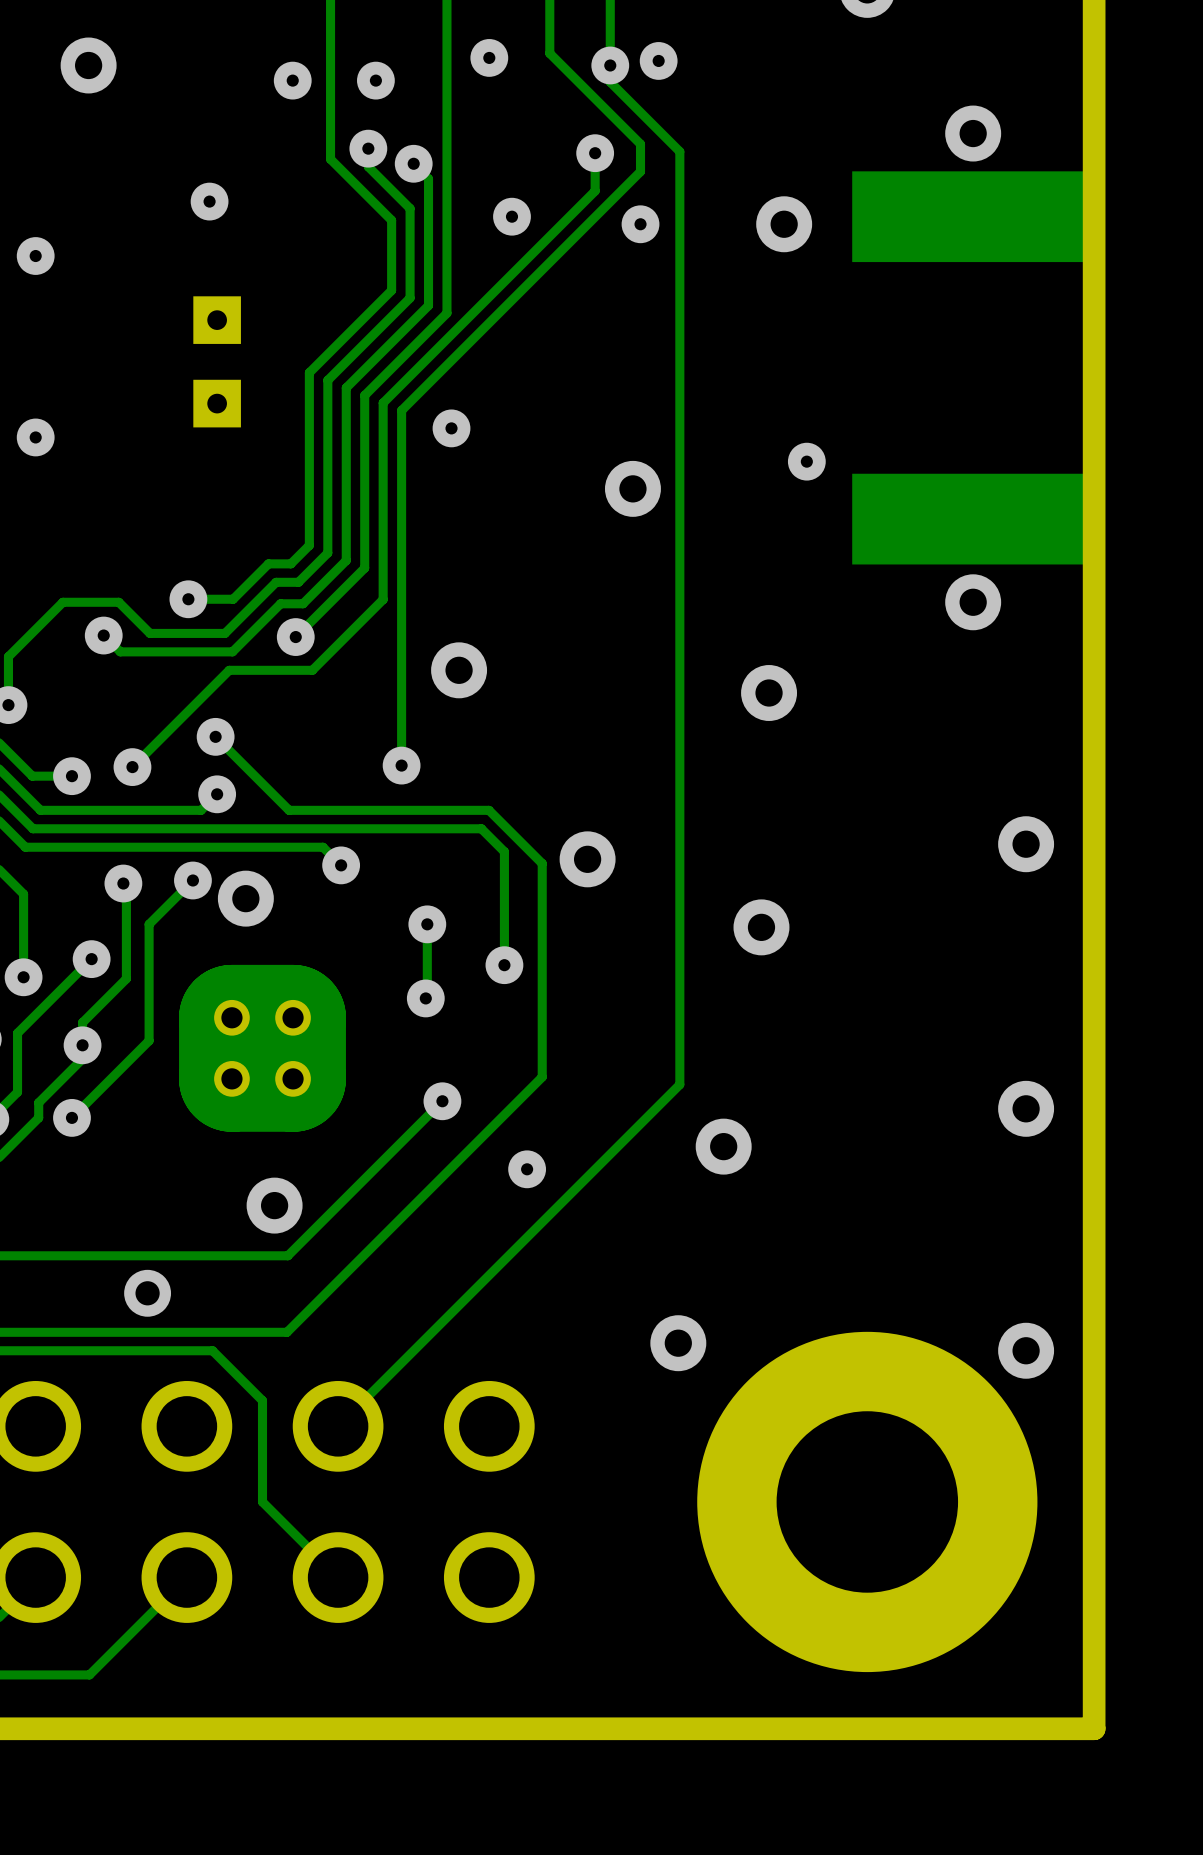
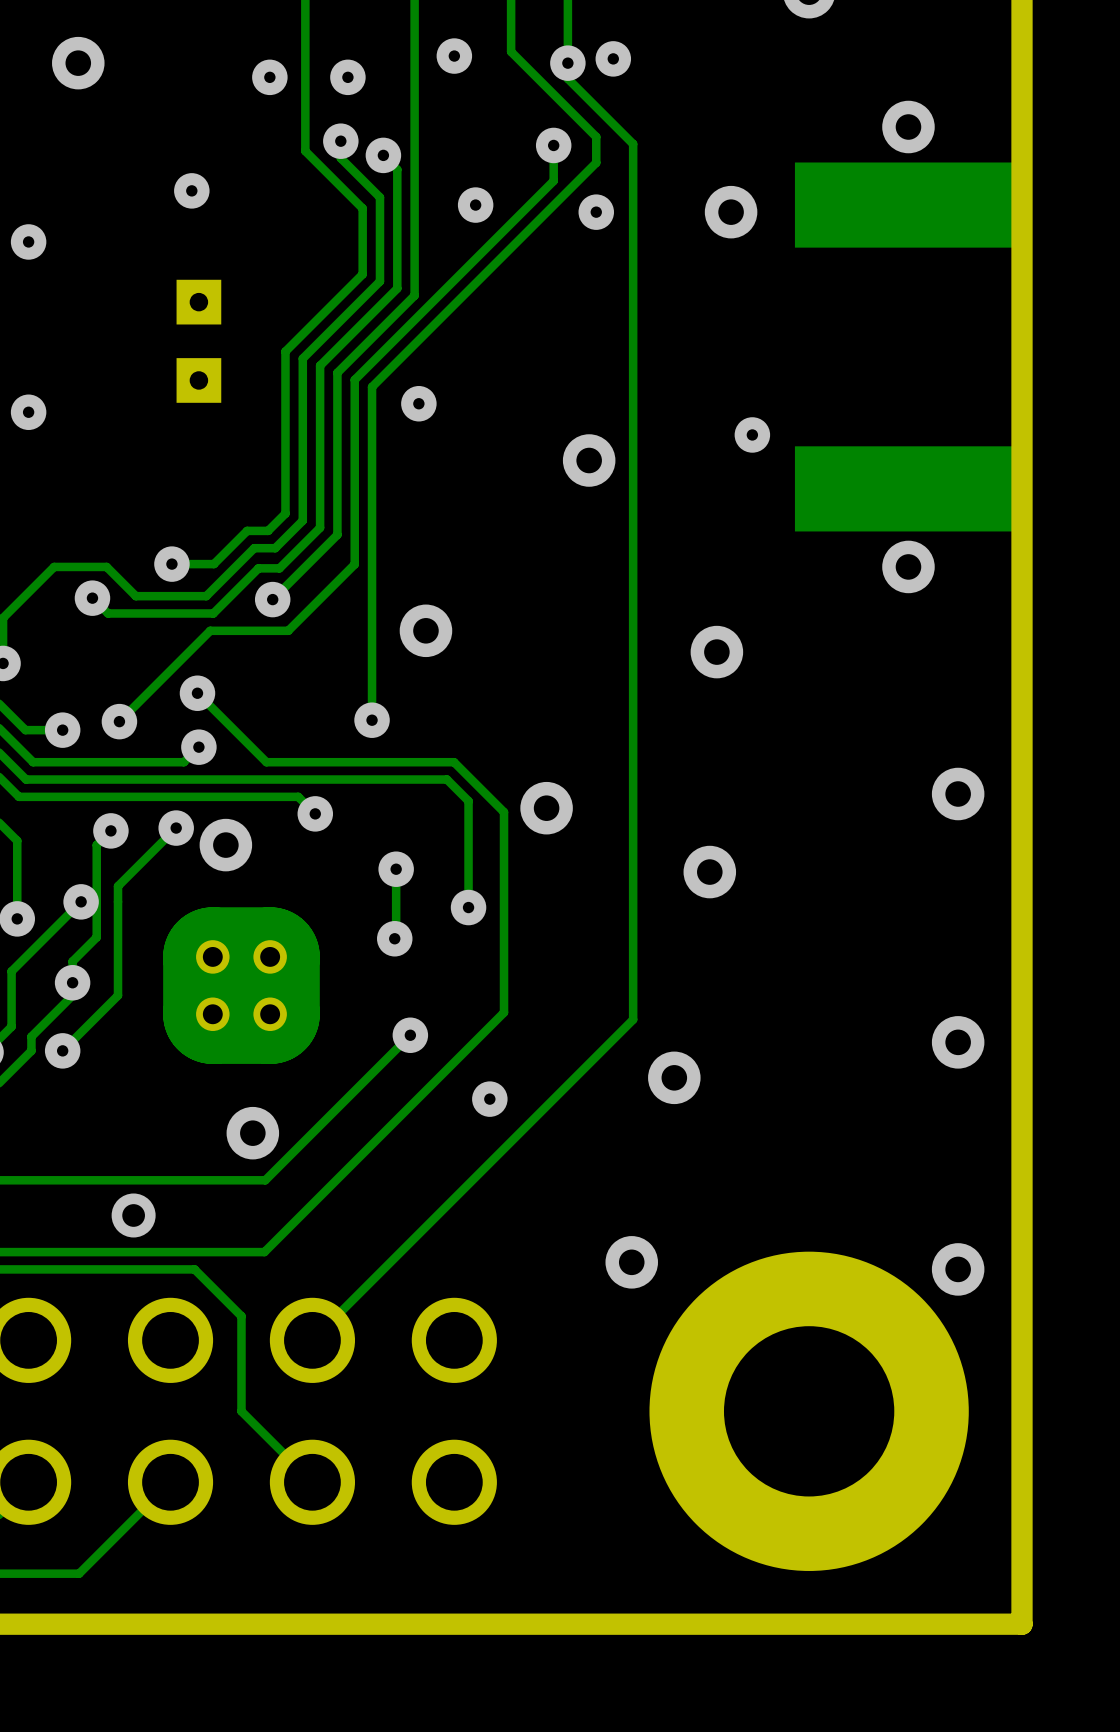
track: (123, 883) (126, 880) (126, 978) (108, 996) -> (110, 830) (96, 845) (96, 937)
track: (149, 924) (149, 1040) (130, 1058) -> (135, 869) (118, 886) (118, 995)

